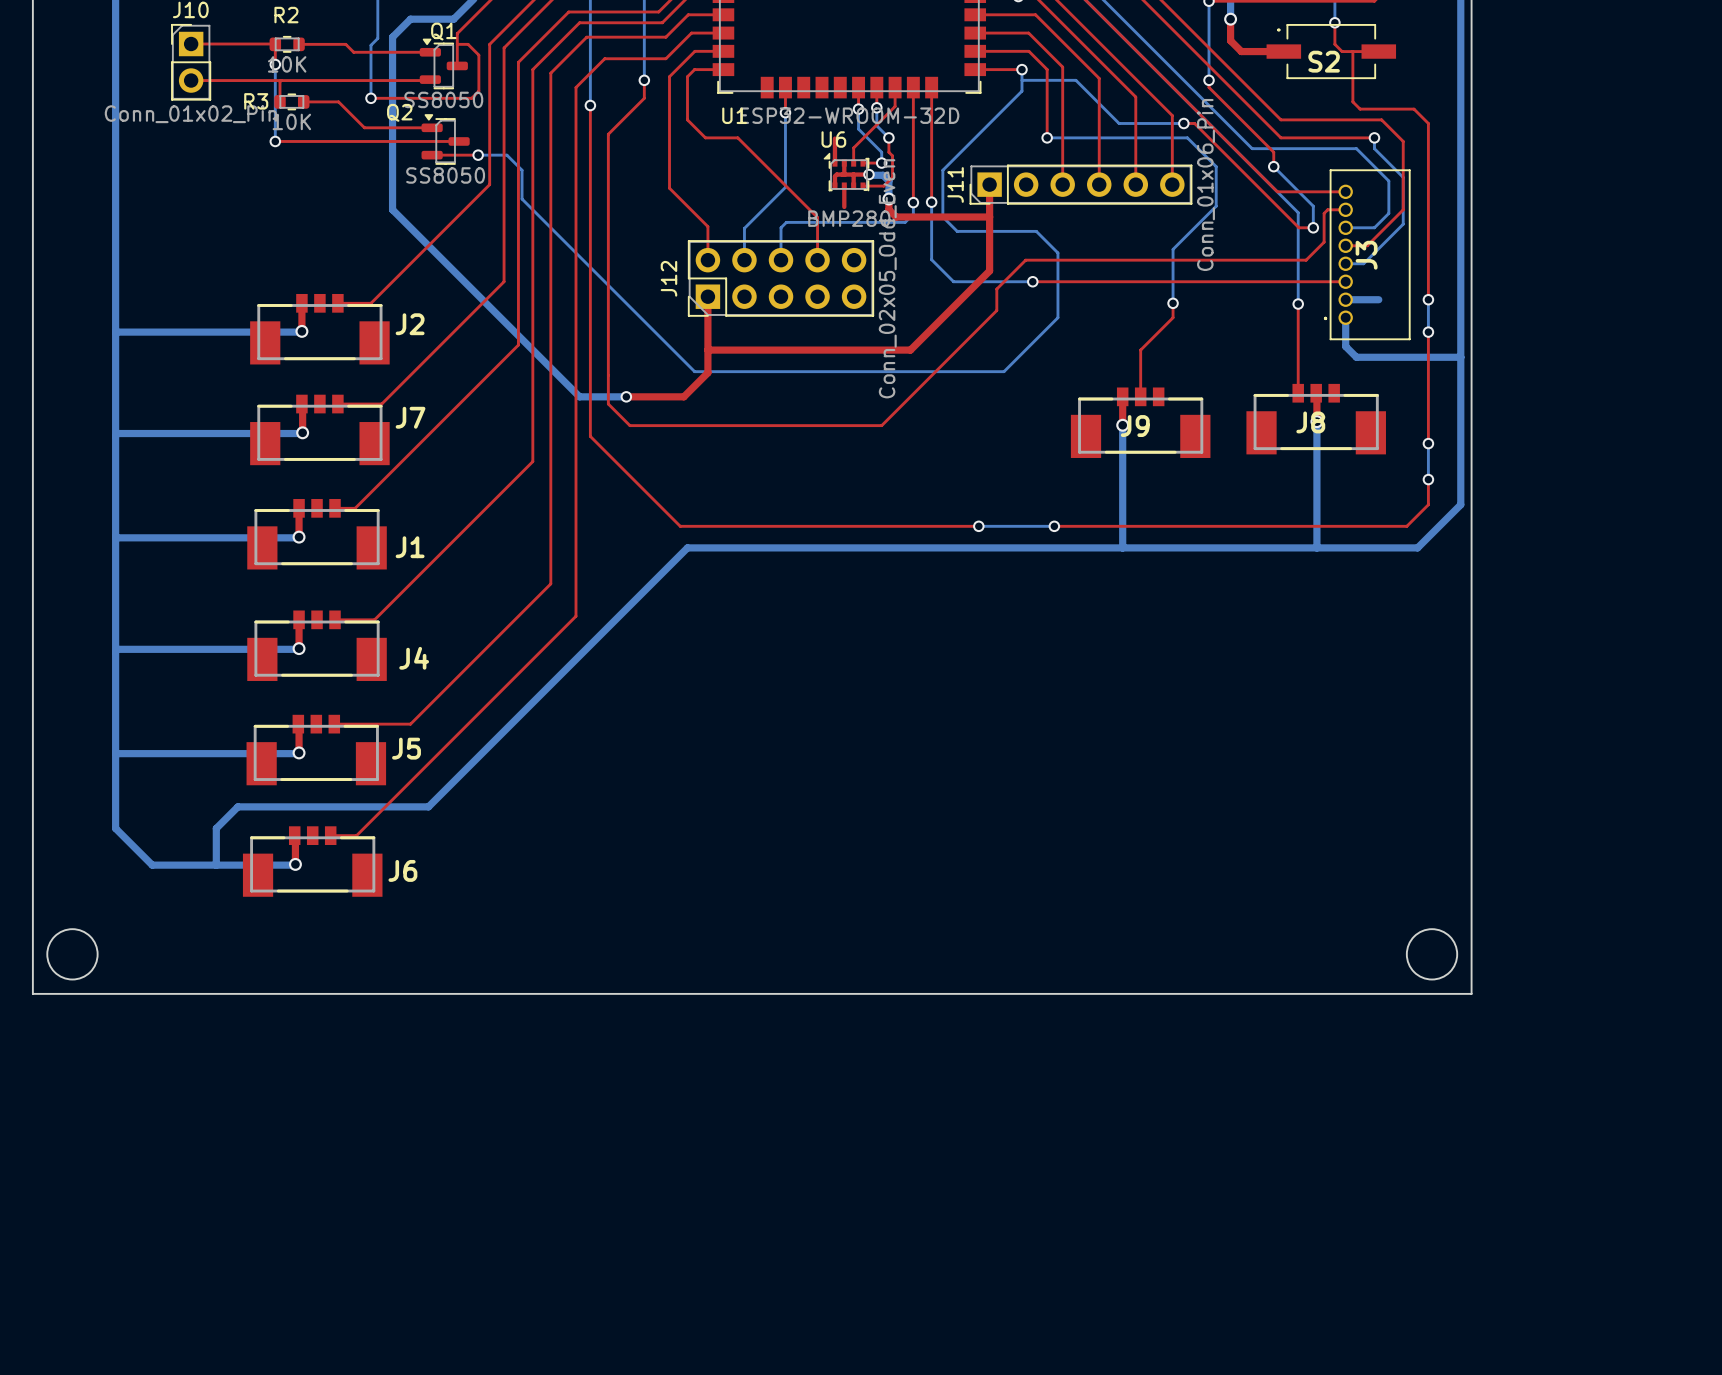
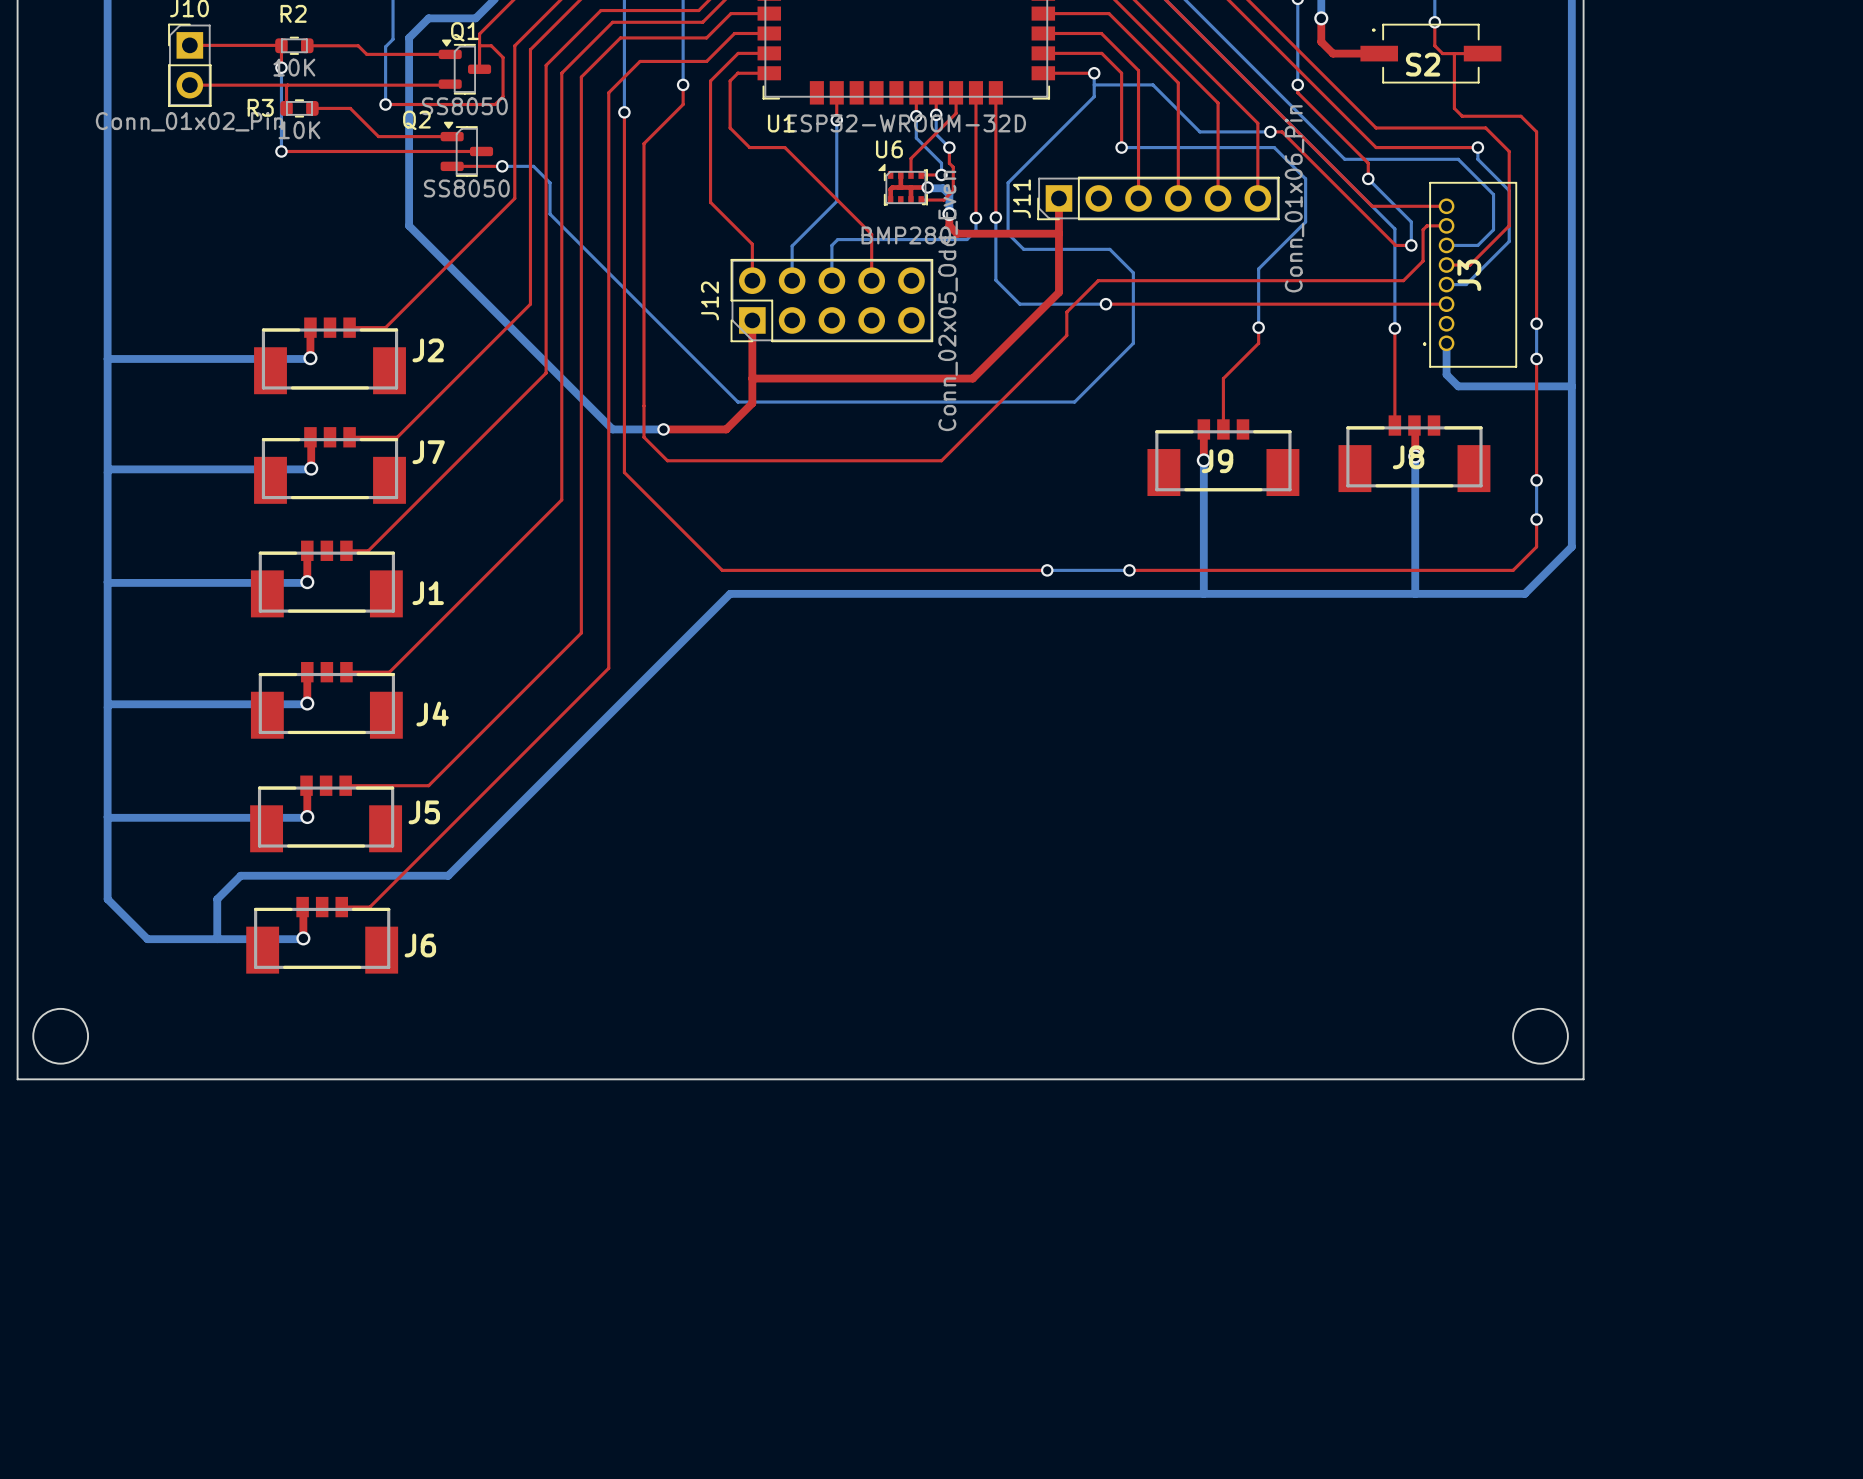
top track: (834, 138) (834, 163) -> none
top track: (844, 186) (844, 206) -> none
bottom track: (1345, 299) (1378, 299) -> none

